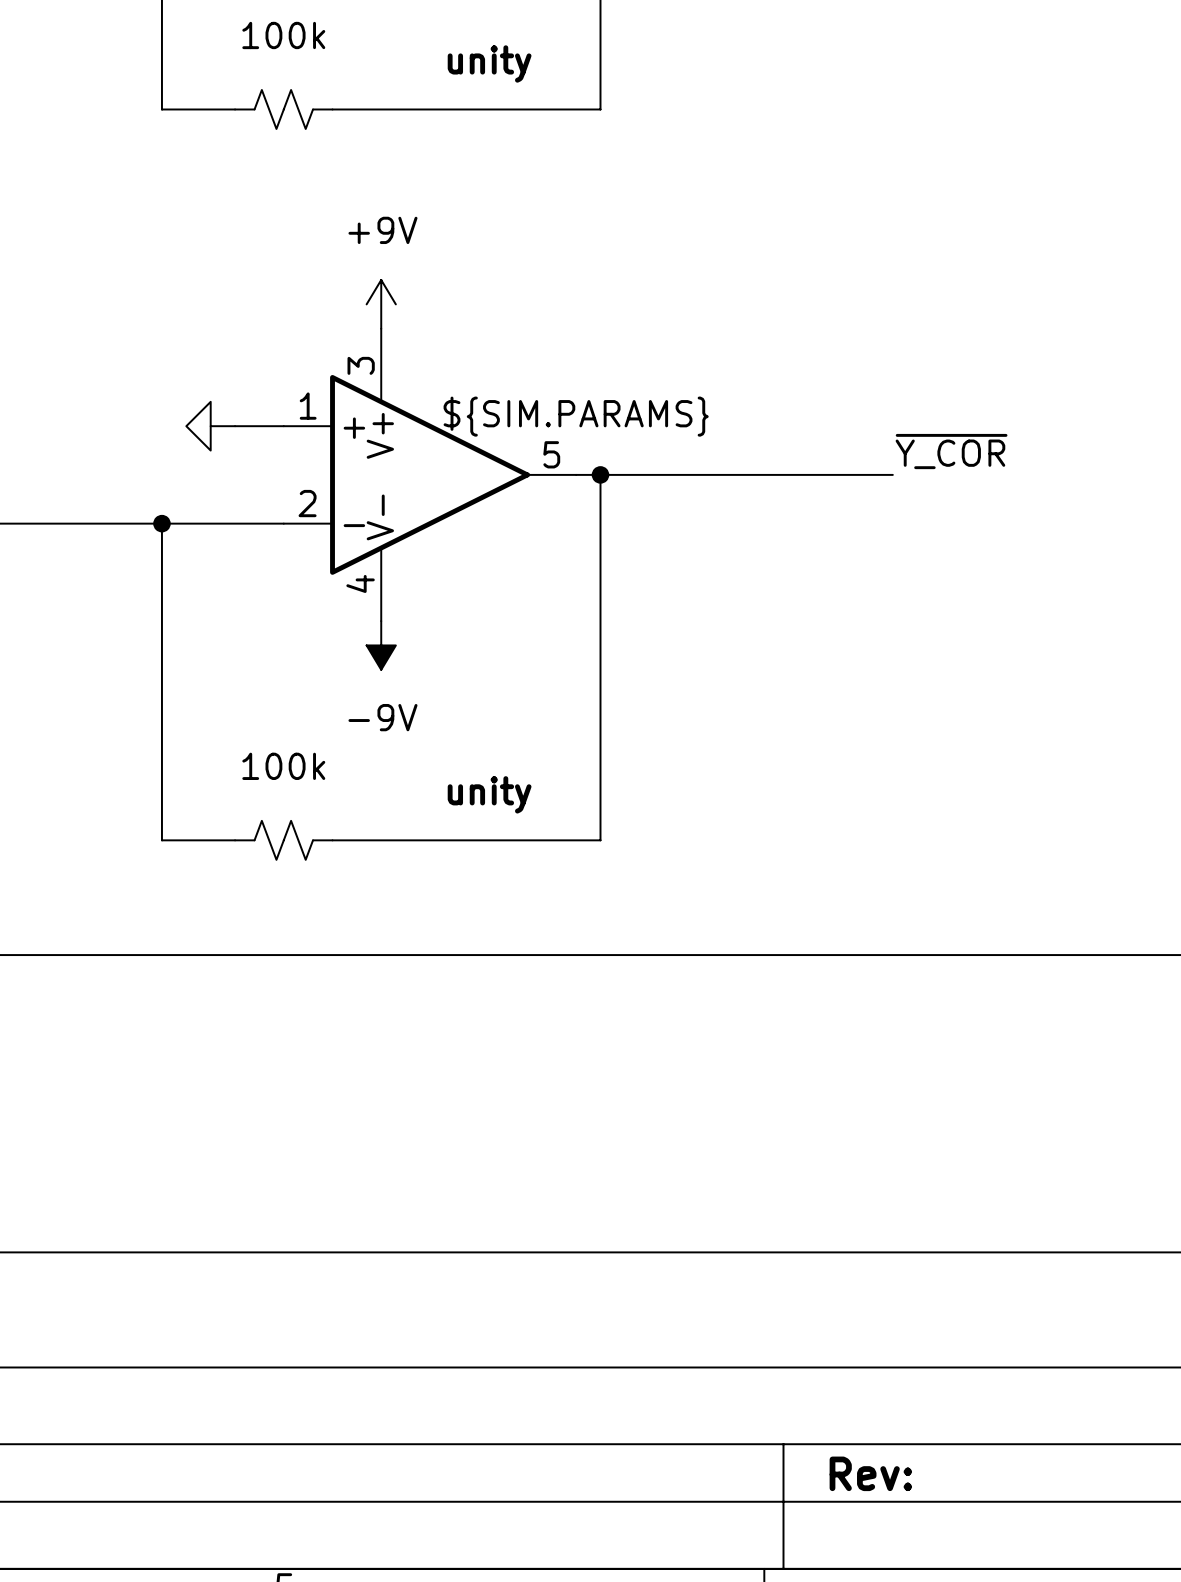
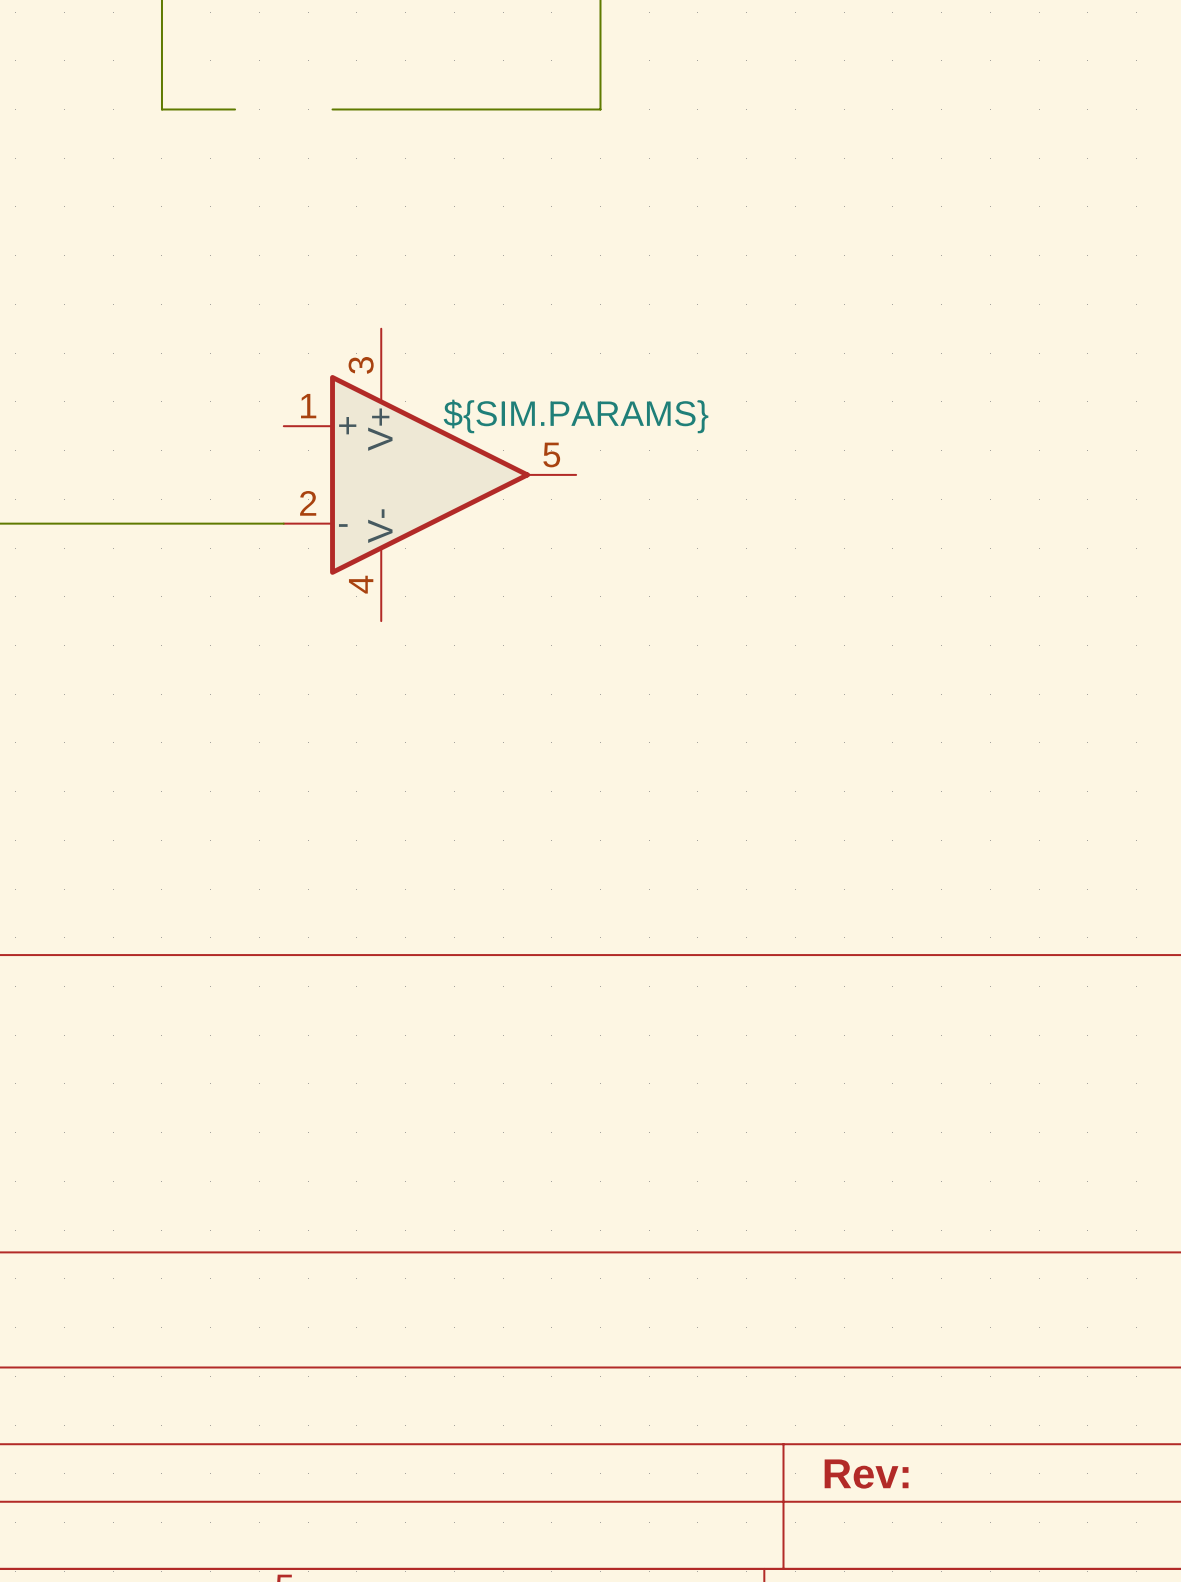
text: unity (489, 63) -> none
part: 100k (283, 109) -> none
power symbol: +9V (381, 304) -> none
power symbol: (210, 426) -> none
wire: (235, 426) (283, 426) -> none
label: ~{Y_COR} (951, 451) -> none
wire: (576, 474) (892, 474) -> none
wire: (600, 474) (600, 840) (332, 840) -> none
junction: (600, 474) -> none
wire: (161, 523) (161, 840) (235, 840) -> none
junction: (161, 523) -> none
power symbol: -9V (381, 645) -> none
text: unity (489, 794) -> none
part: 100k (283, 840) -> none

